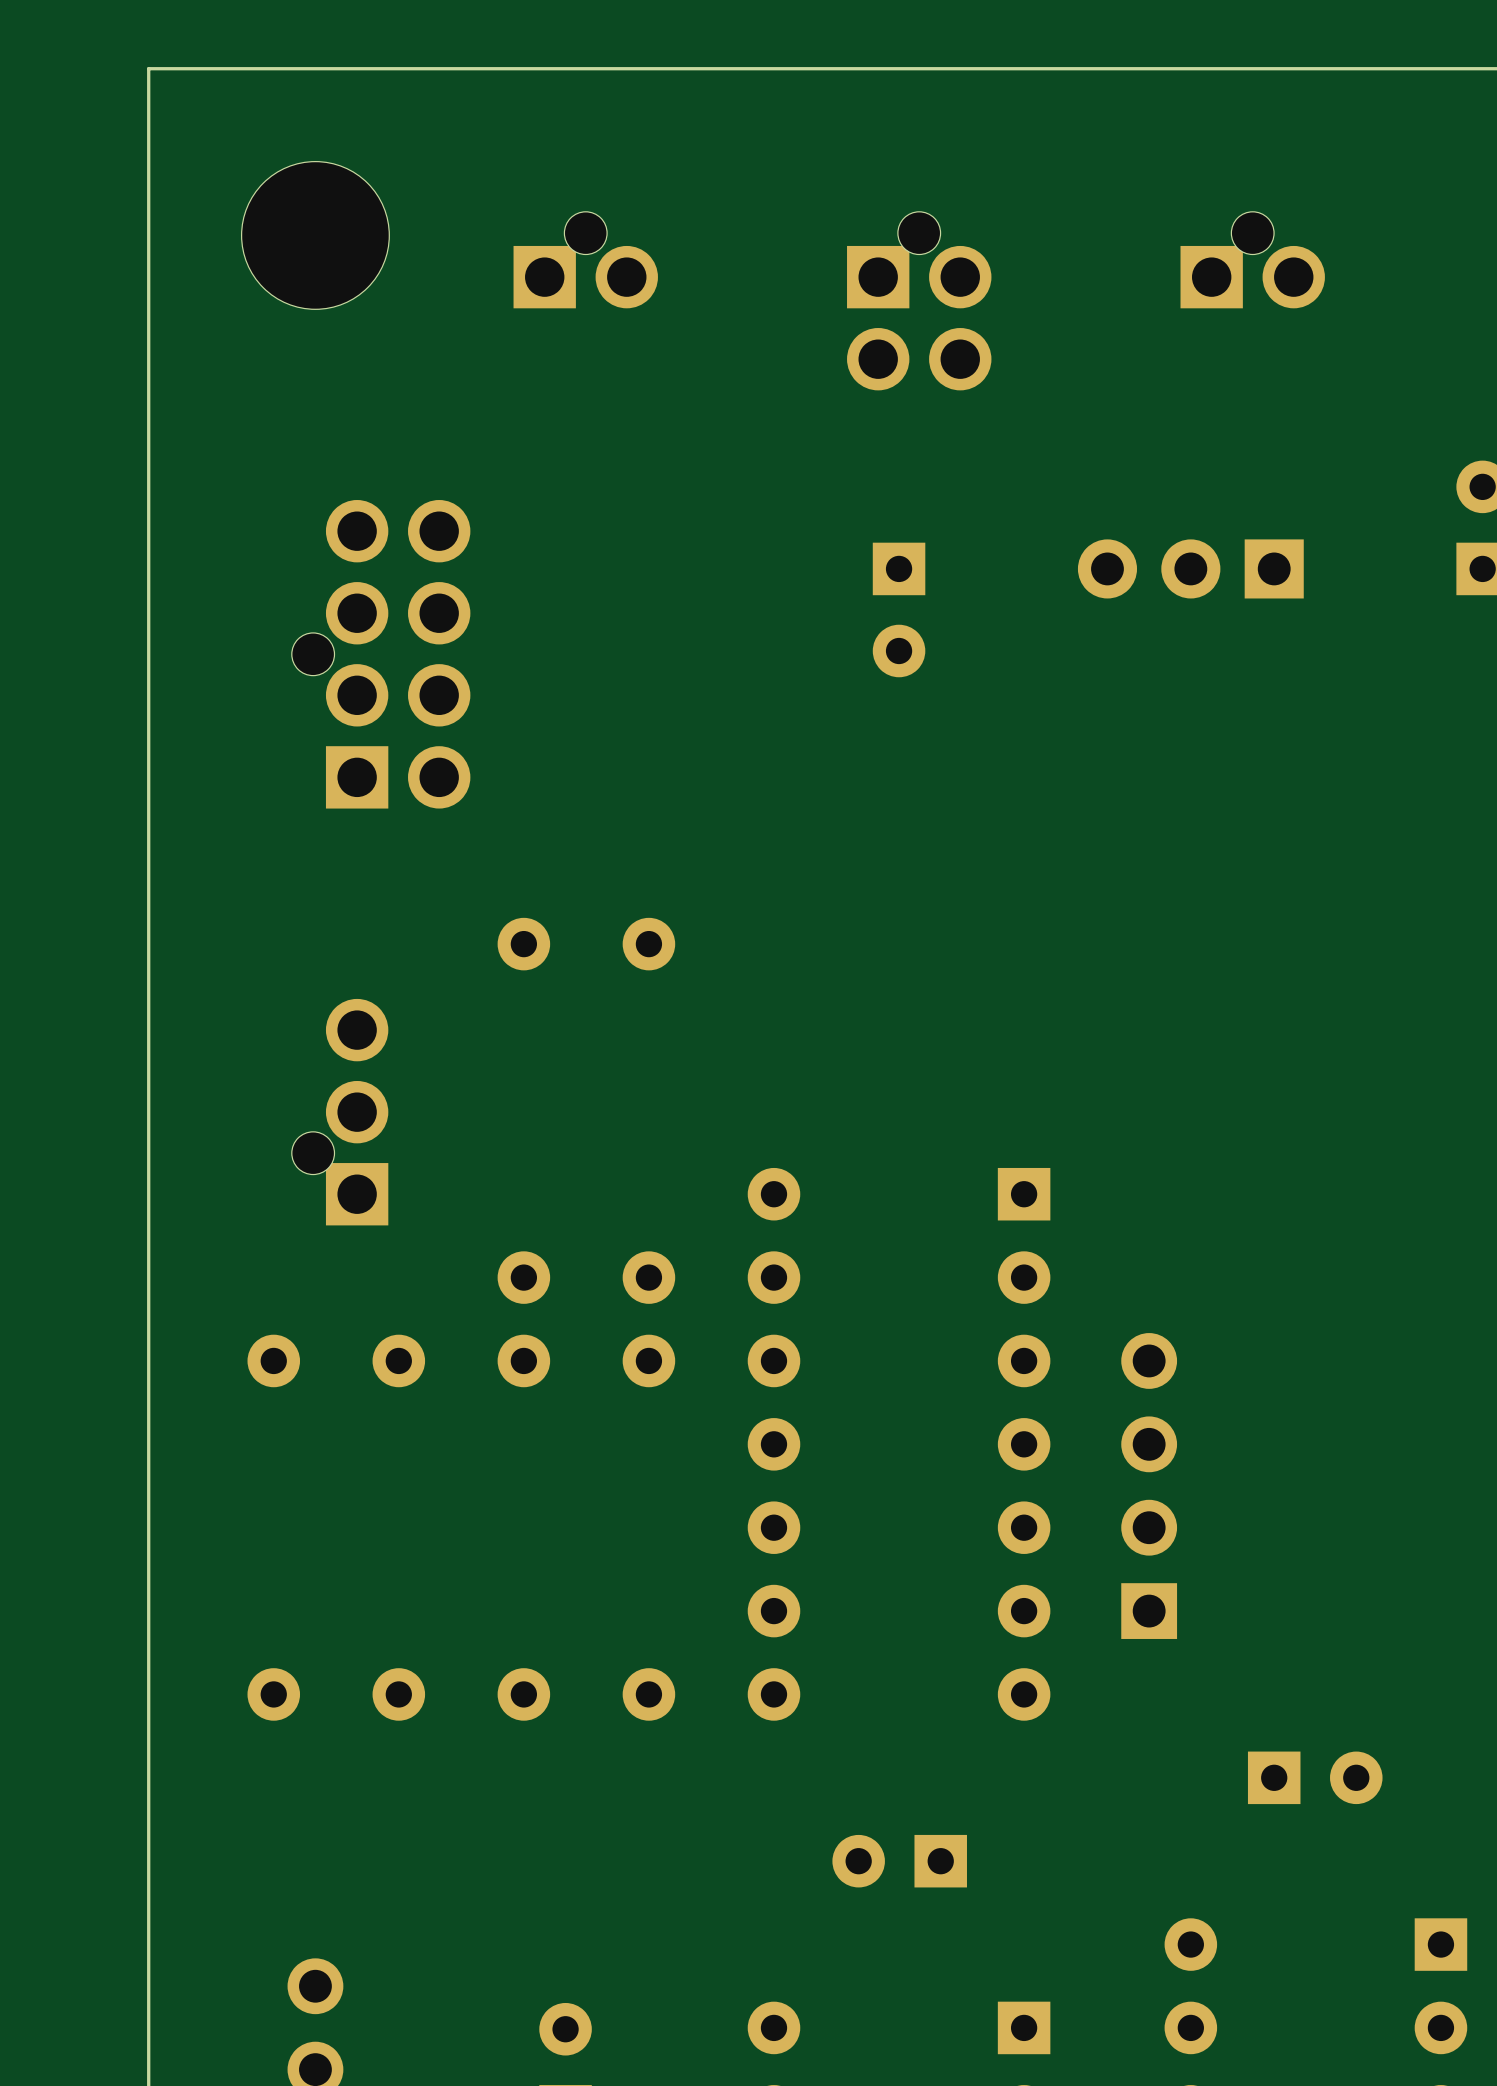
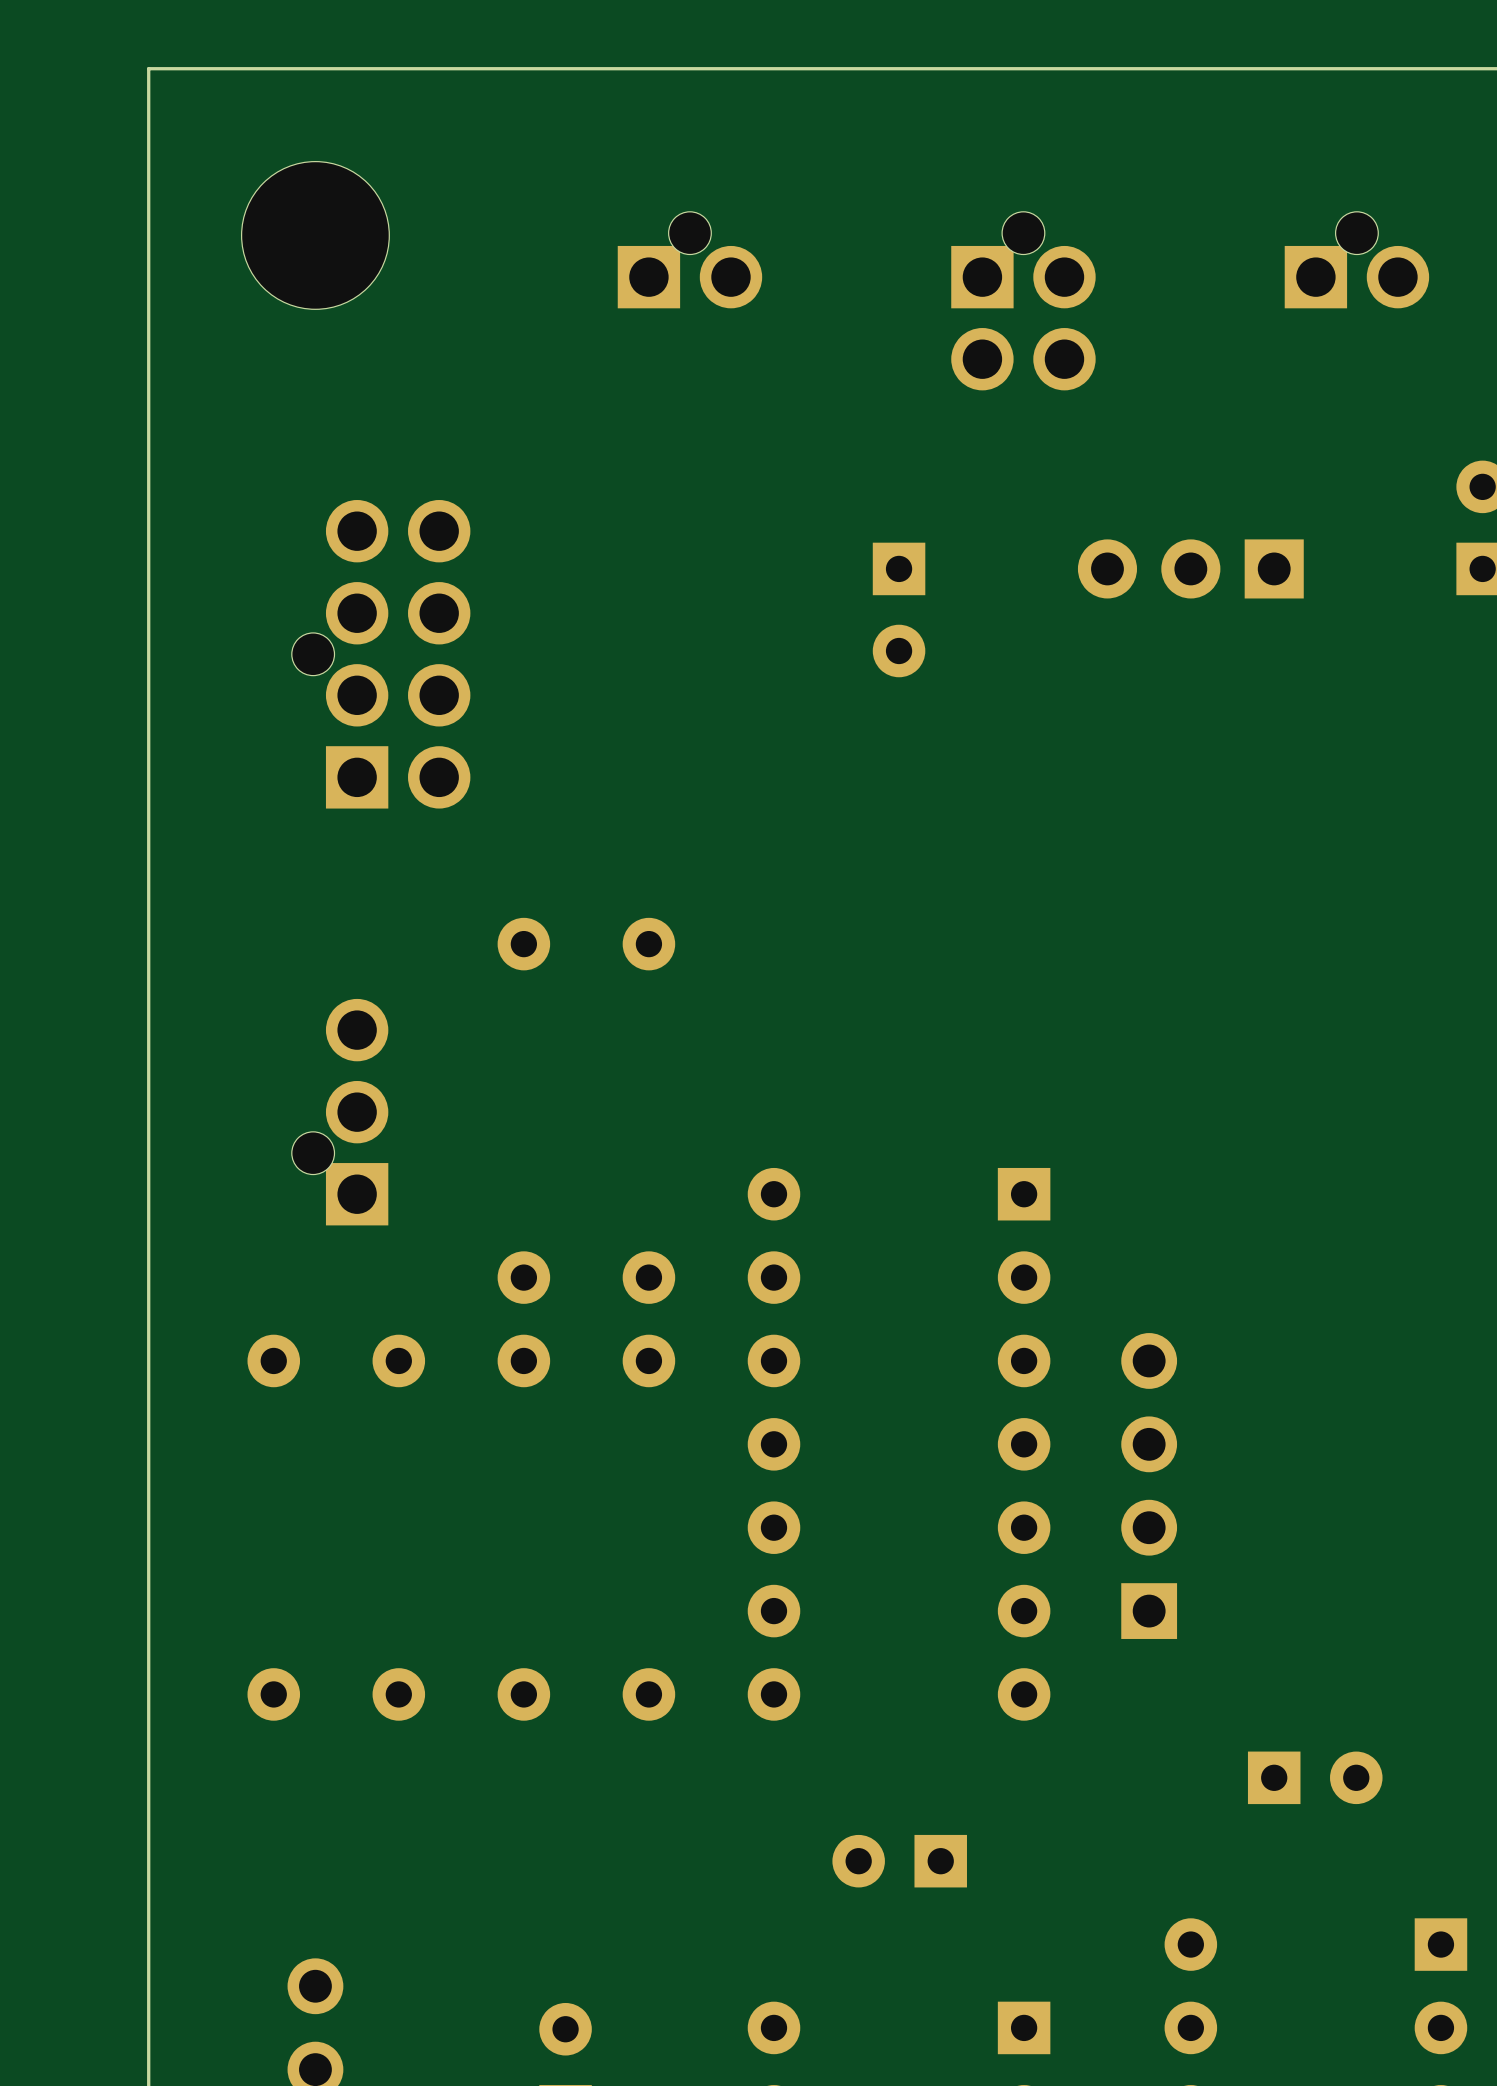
part position: (585, 260) -> (689, 260)
part position: (1252, 260) -> (1356, 260)
part position: (919, 301) -> (1023, 301)

